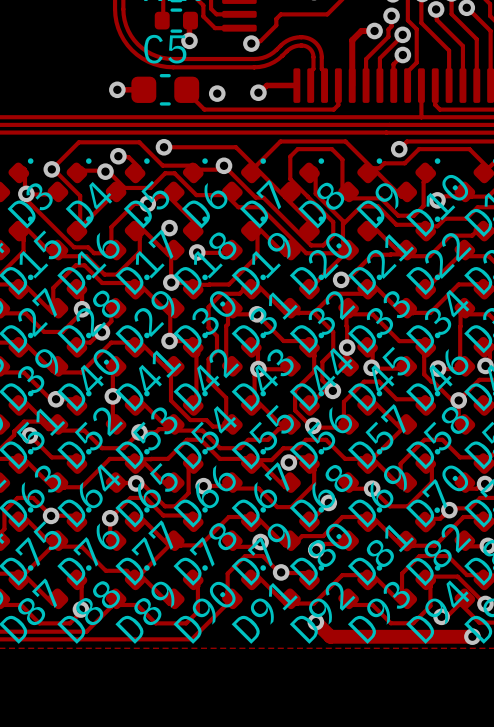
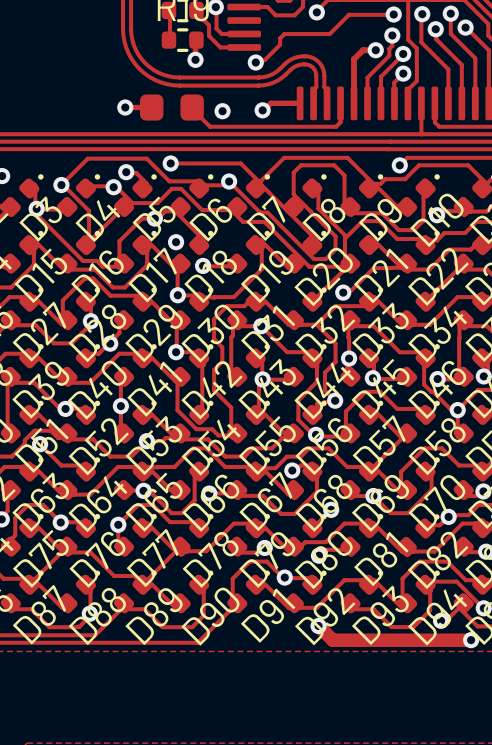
C5: (165, 89) -> none
part: none -> (171, 107)

